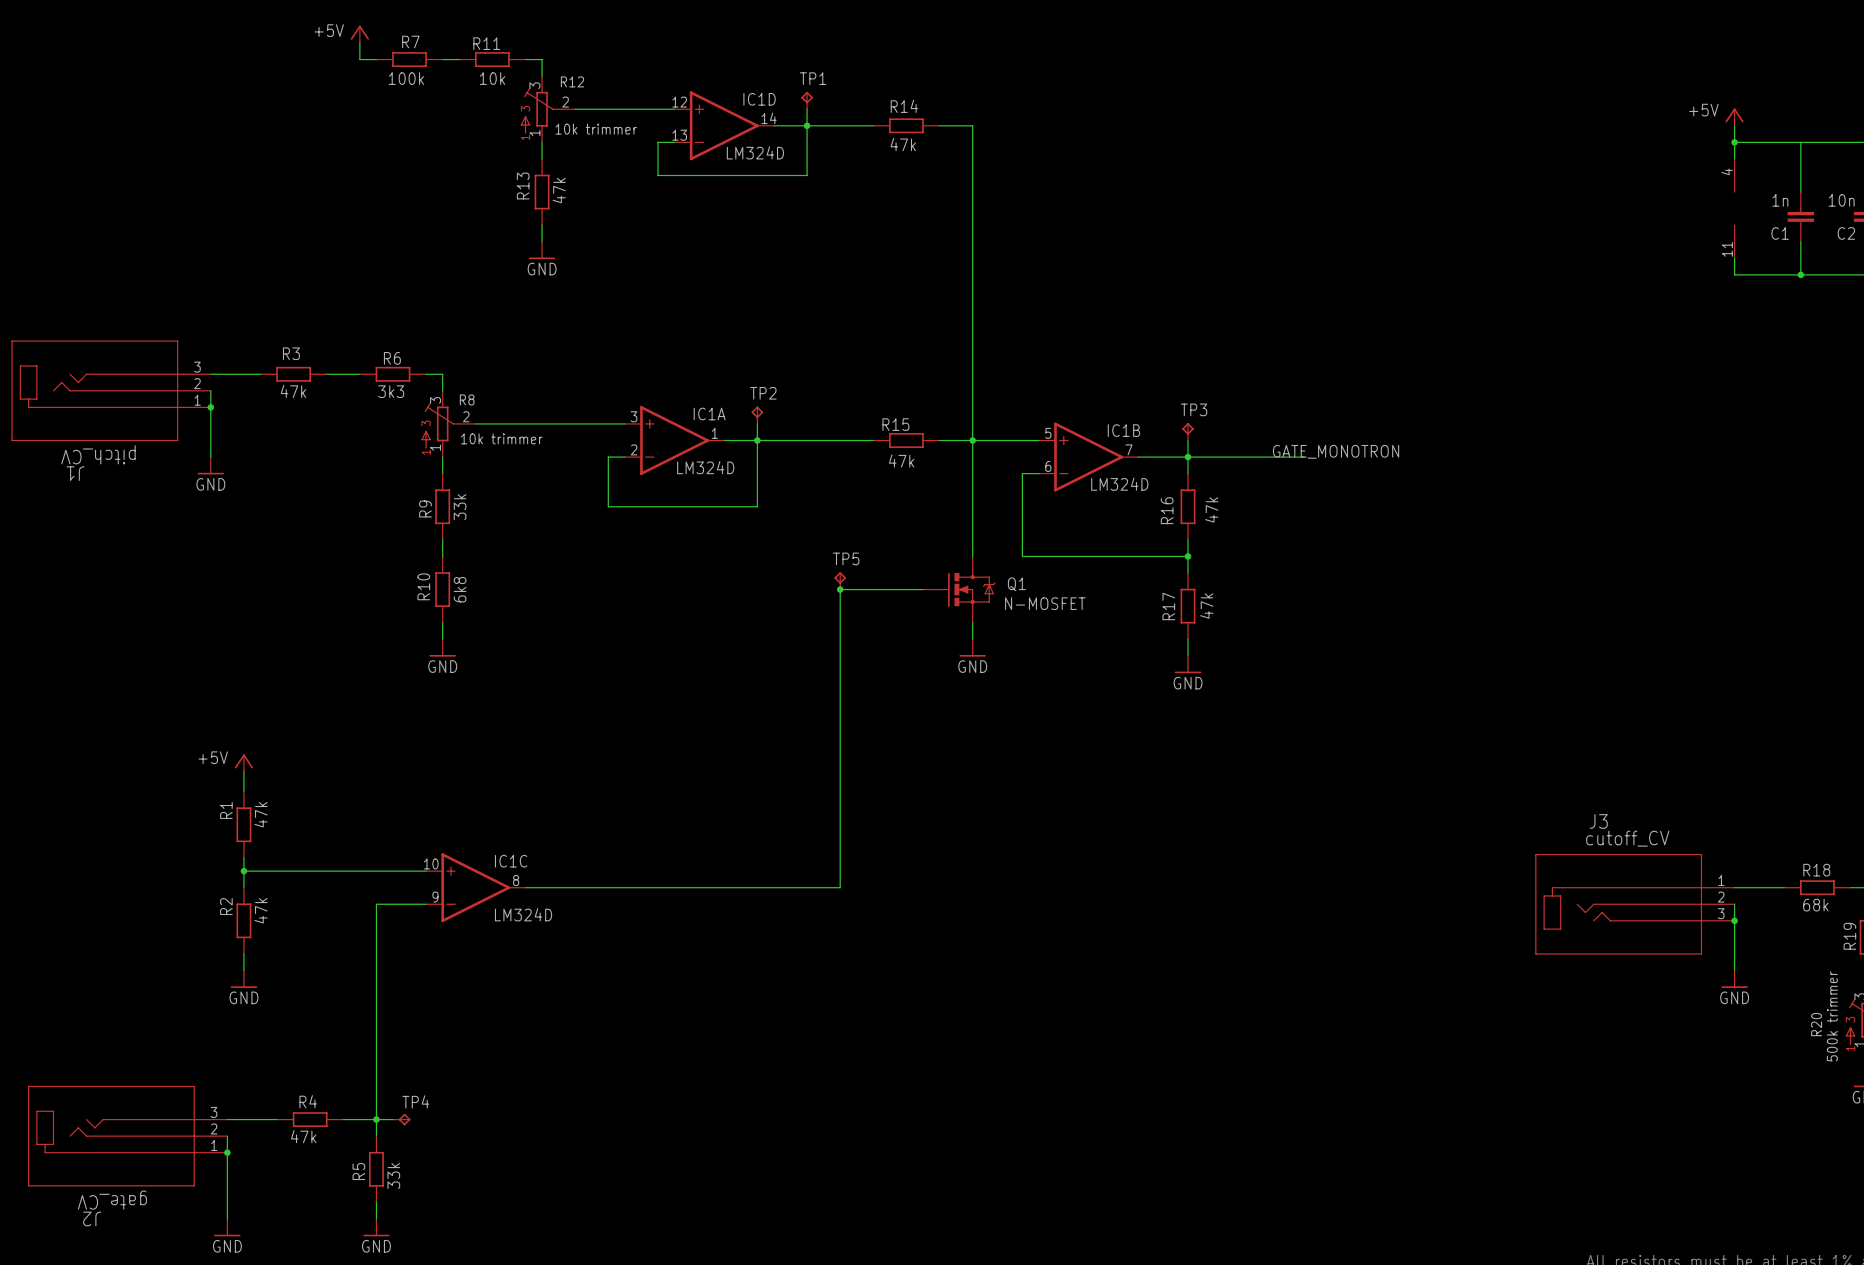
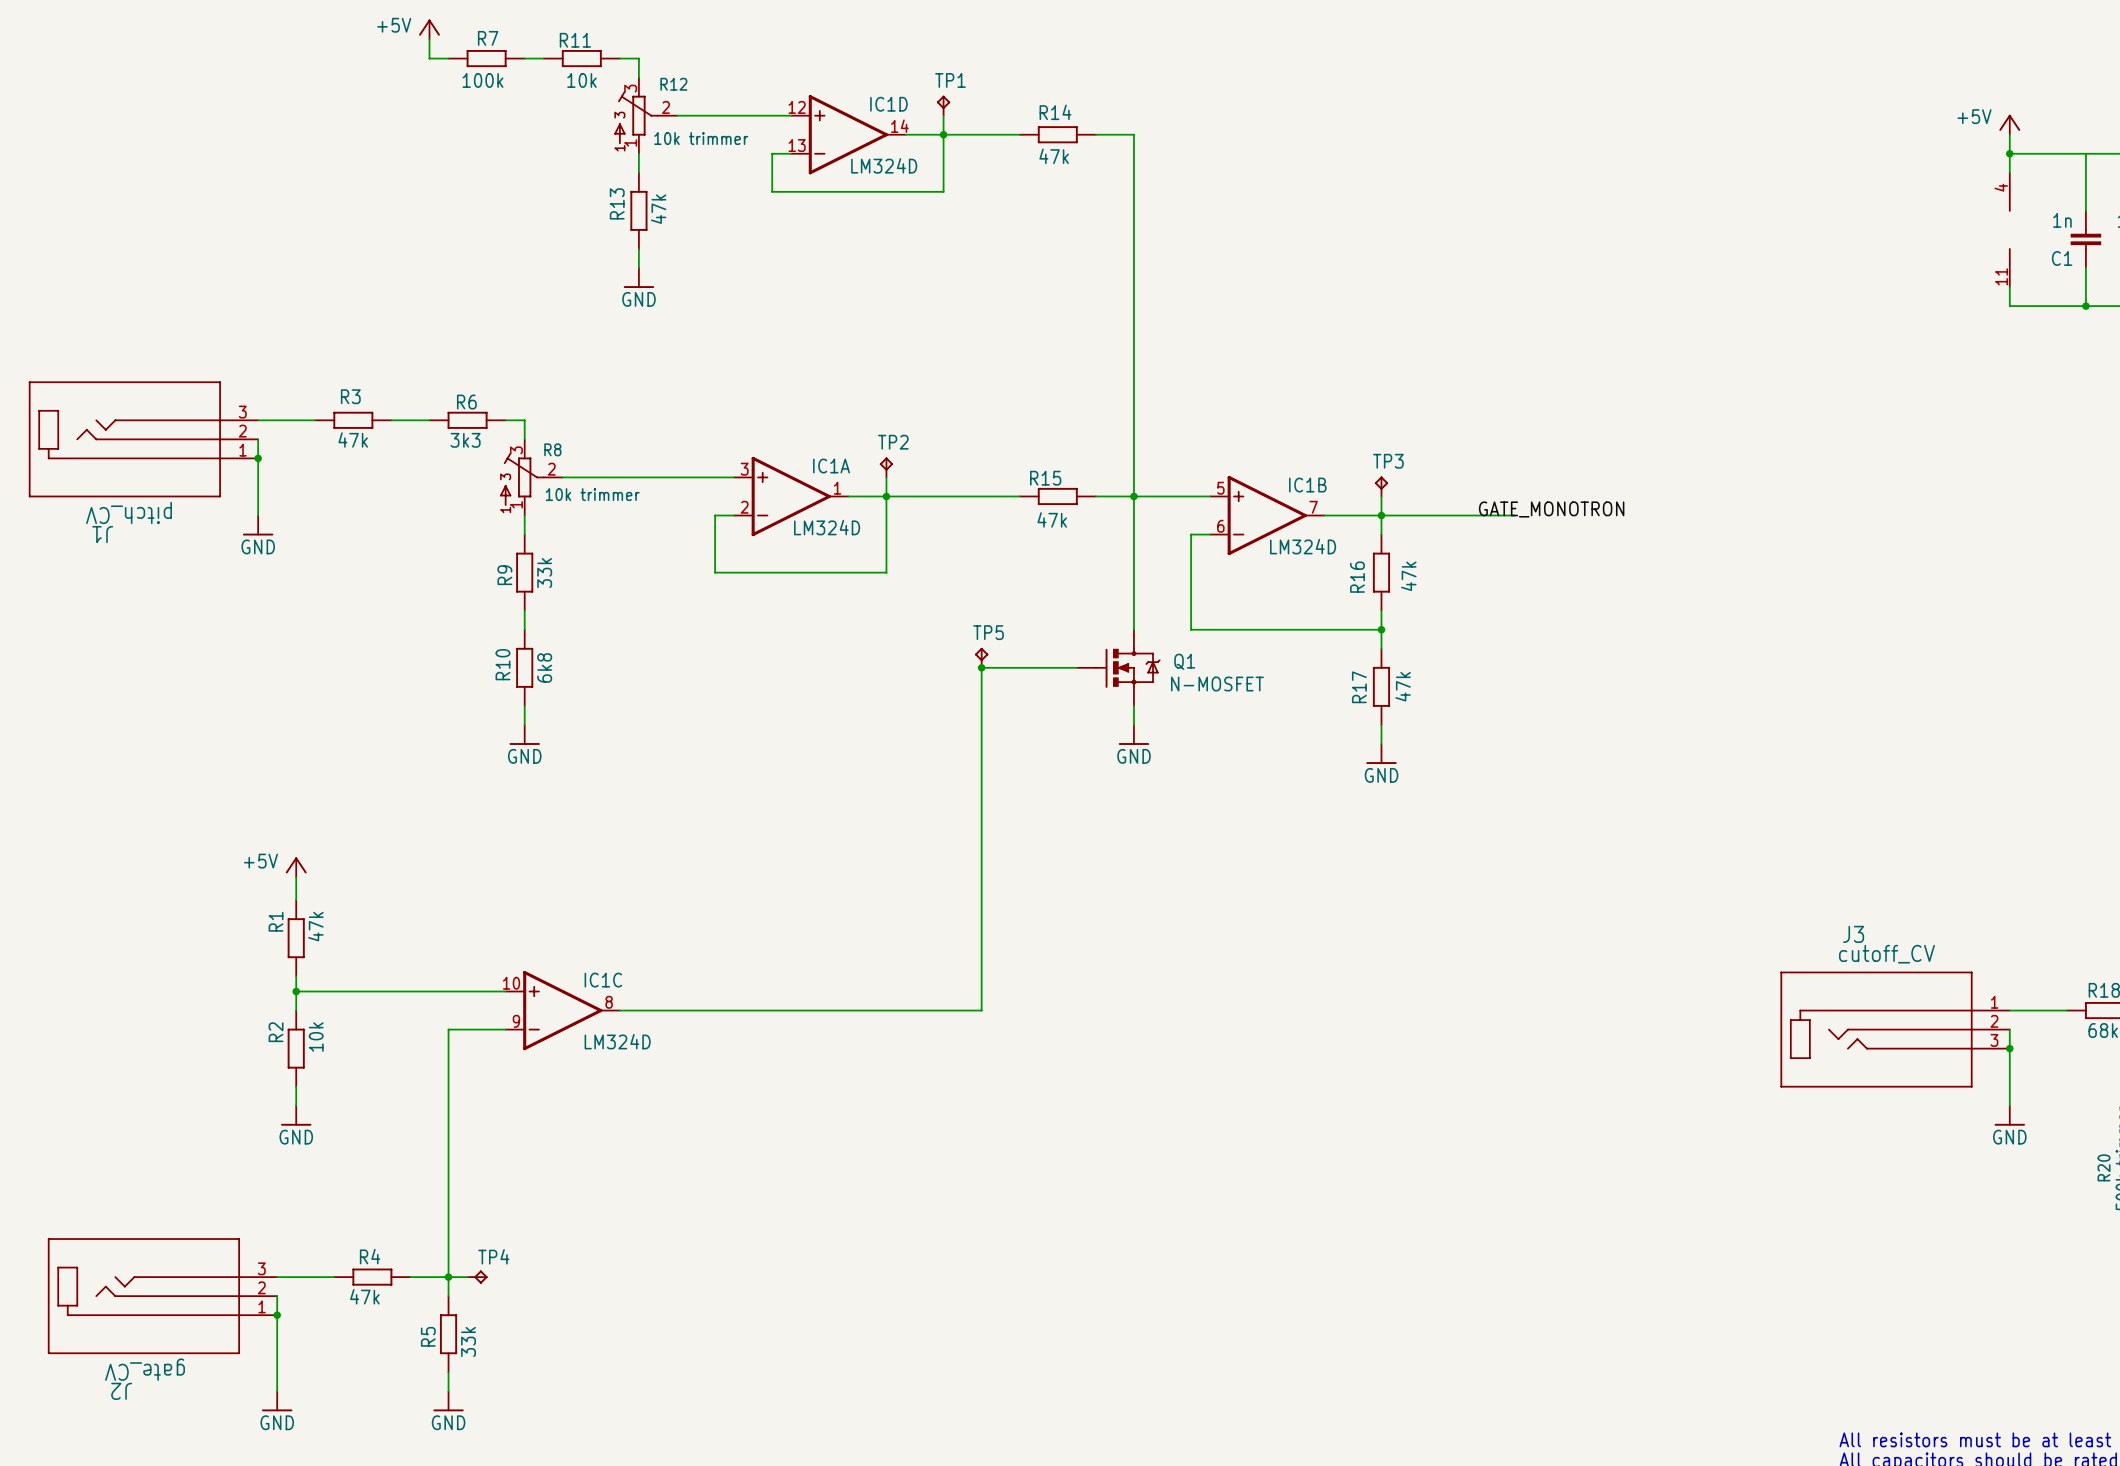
R2 value: 47k (261, 910) -> 10k (316, 1037)

